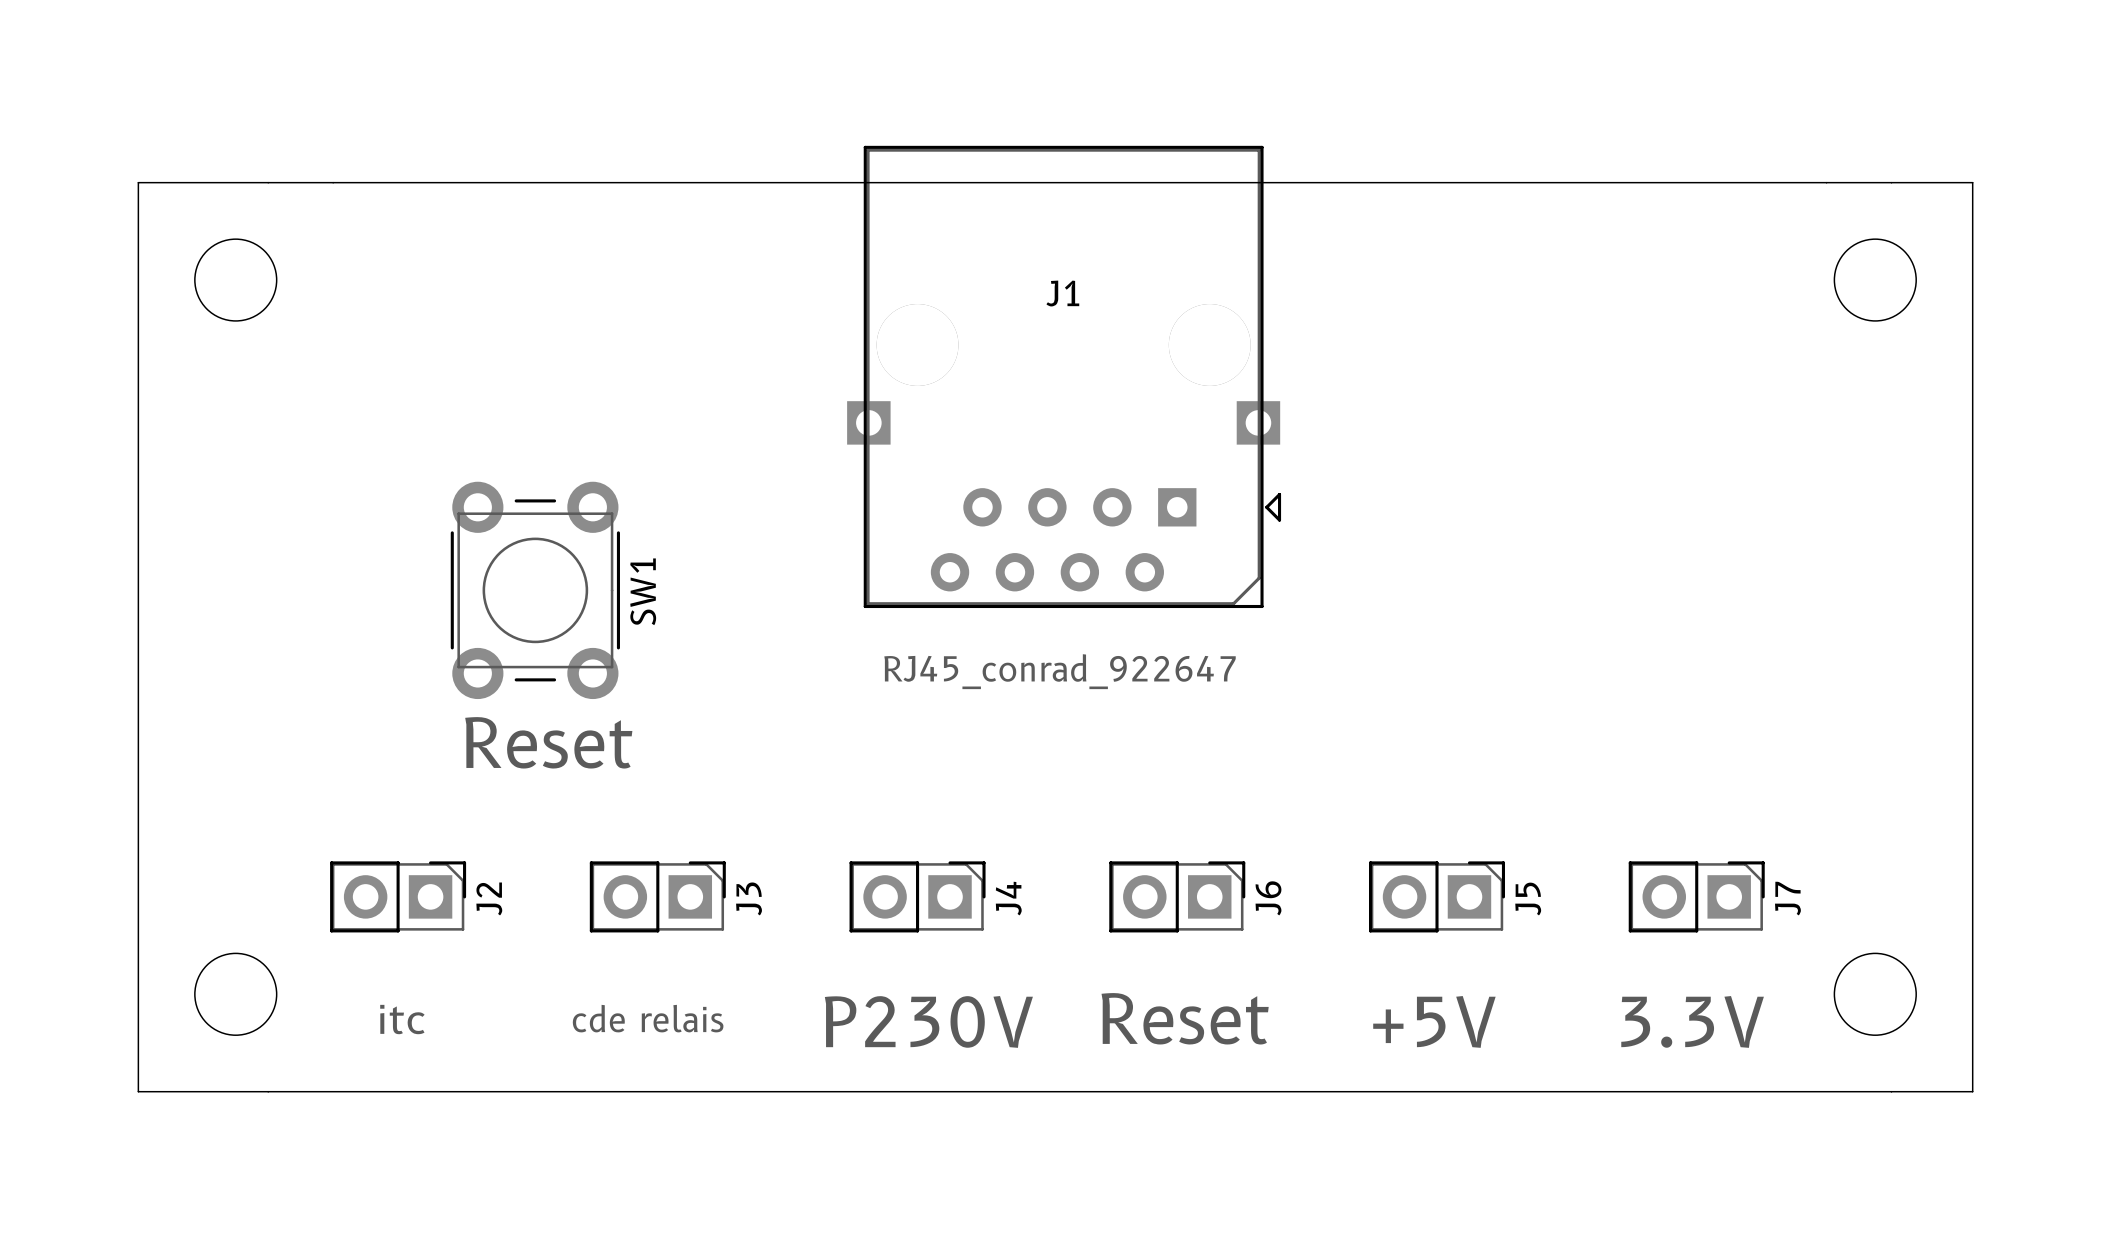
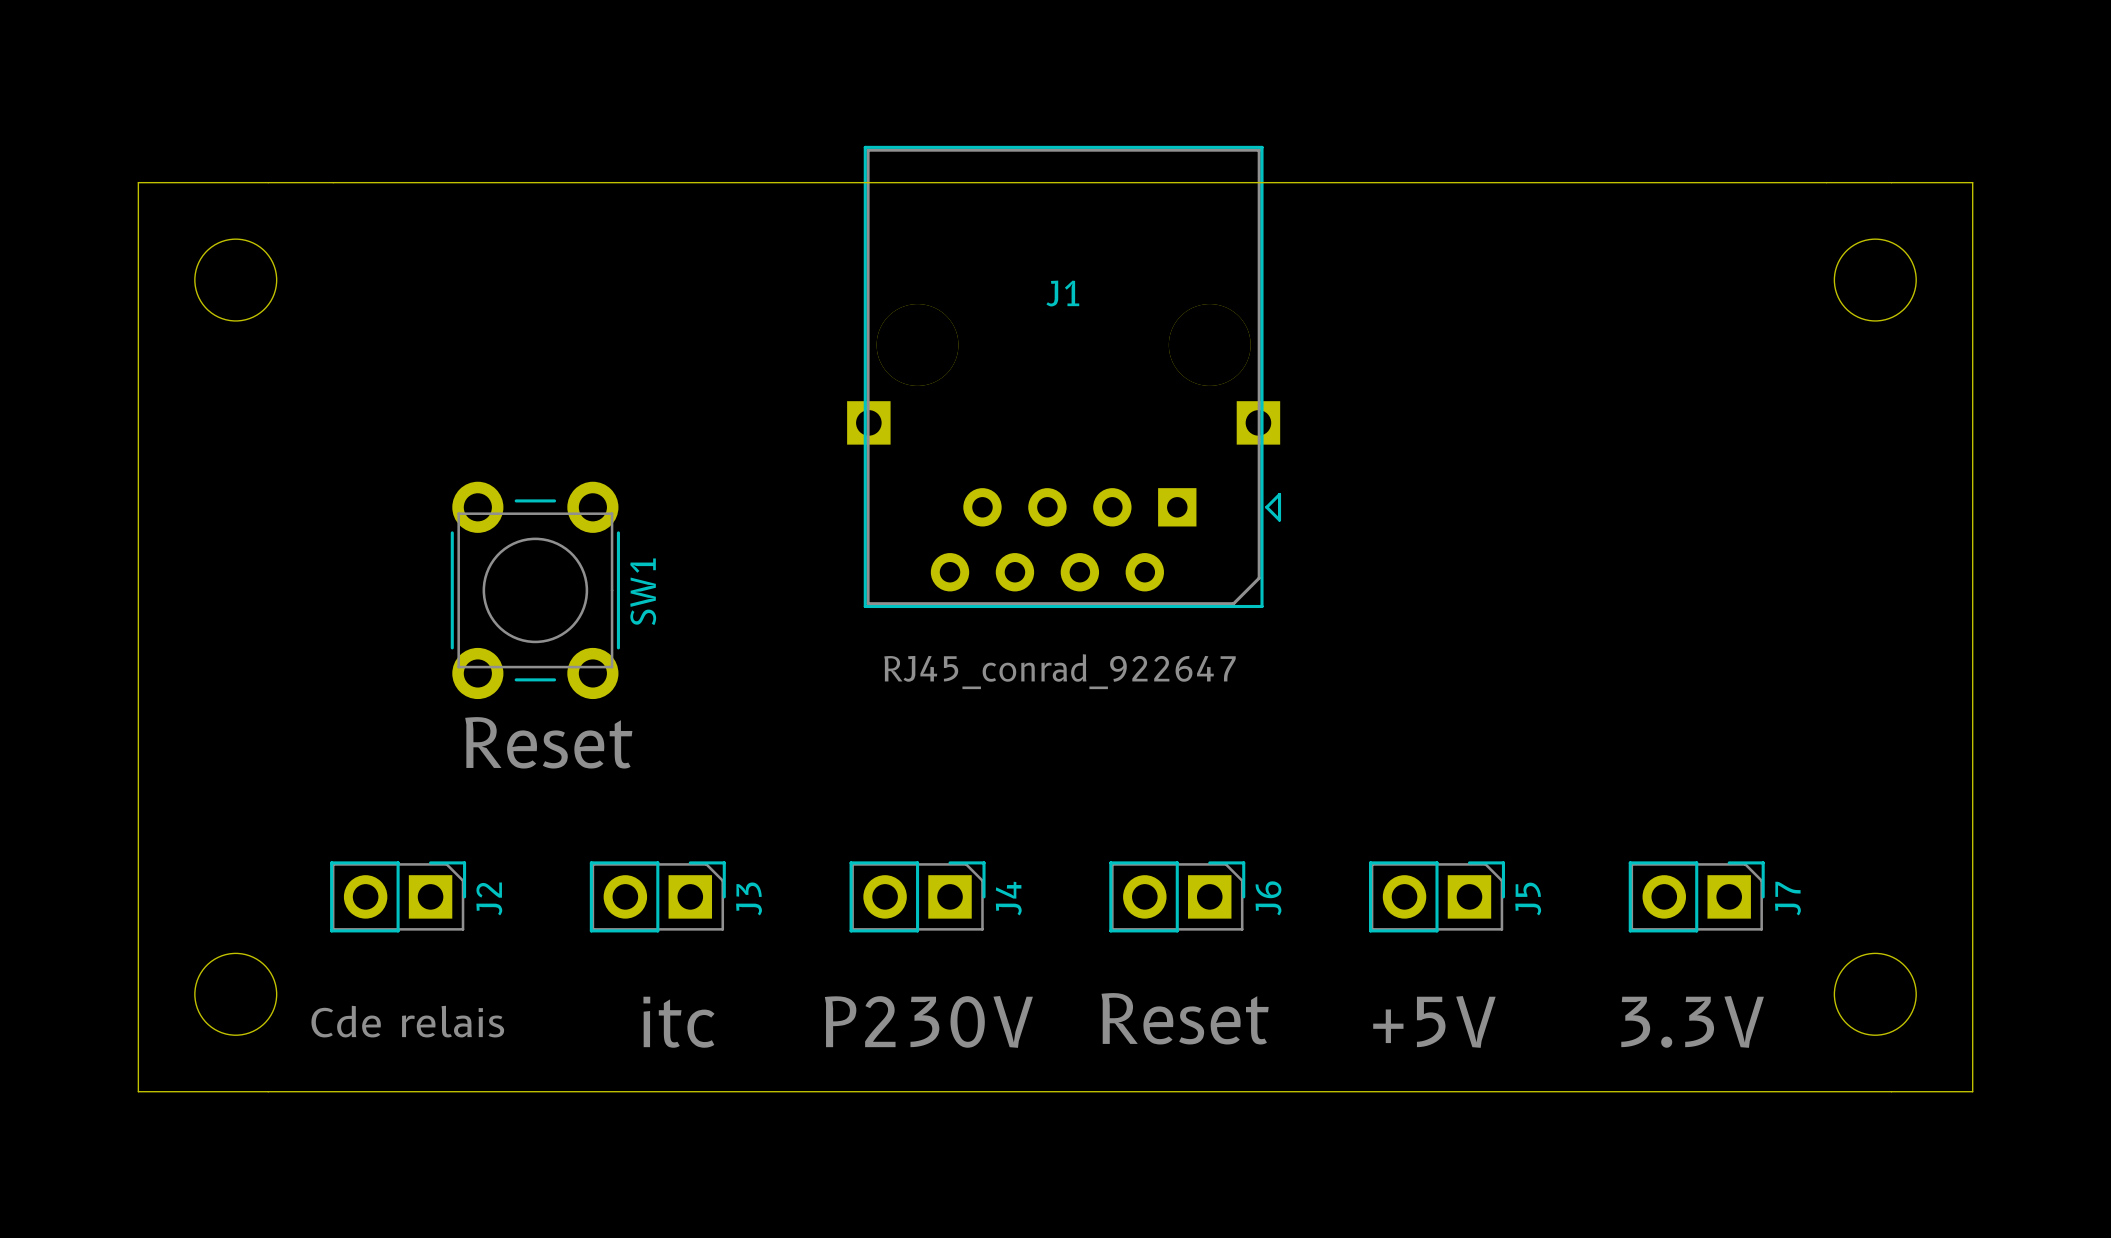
J3 value: cde relais (648, 1018) -> itc (678, 1022)
J2 value: itc (402, 1019) -> Cde relais (407, 1021)

